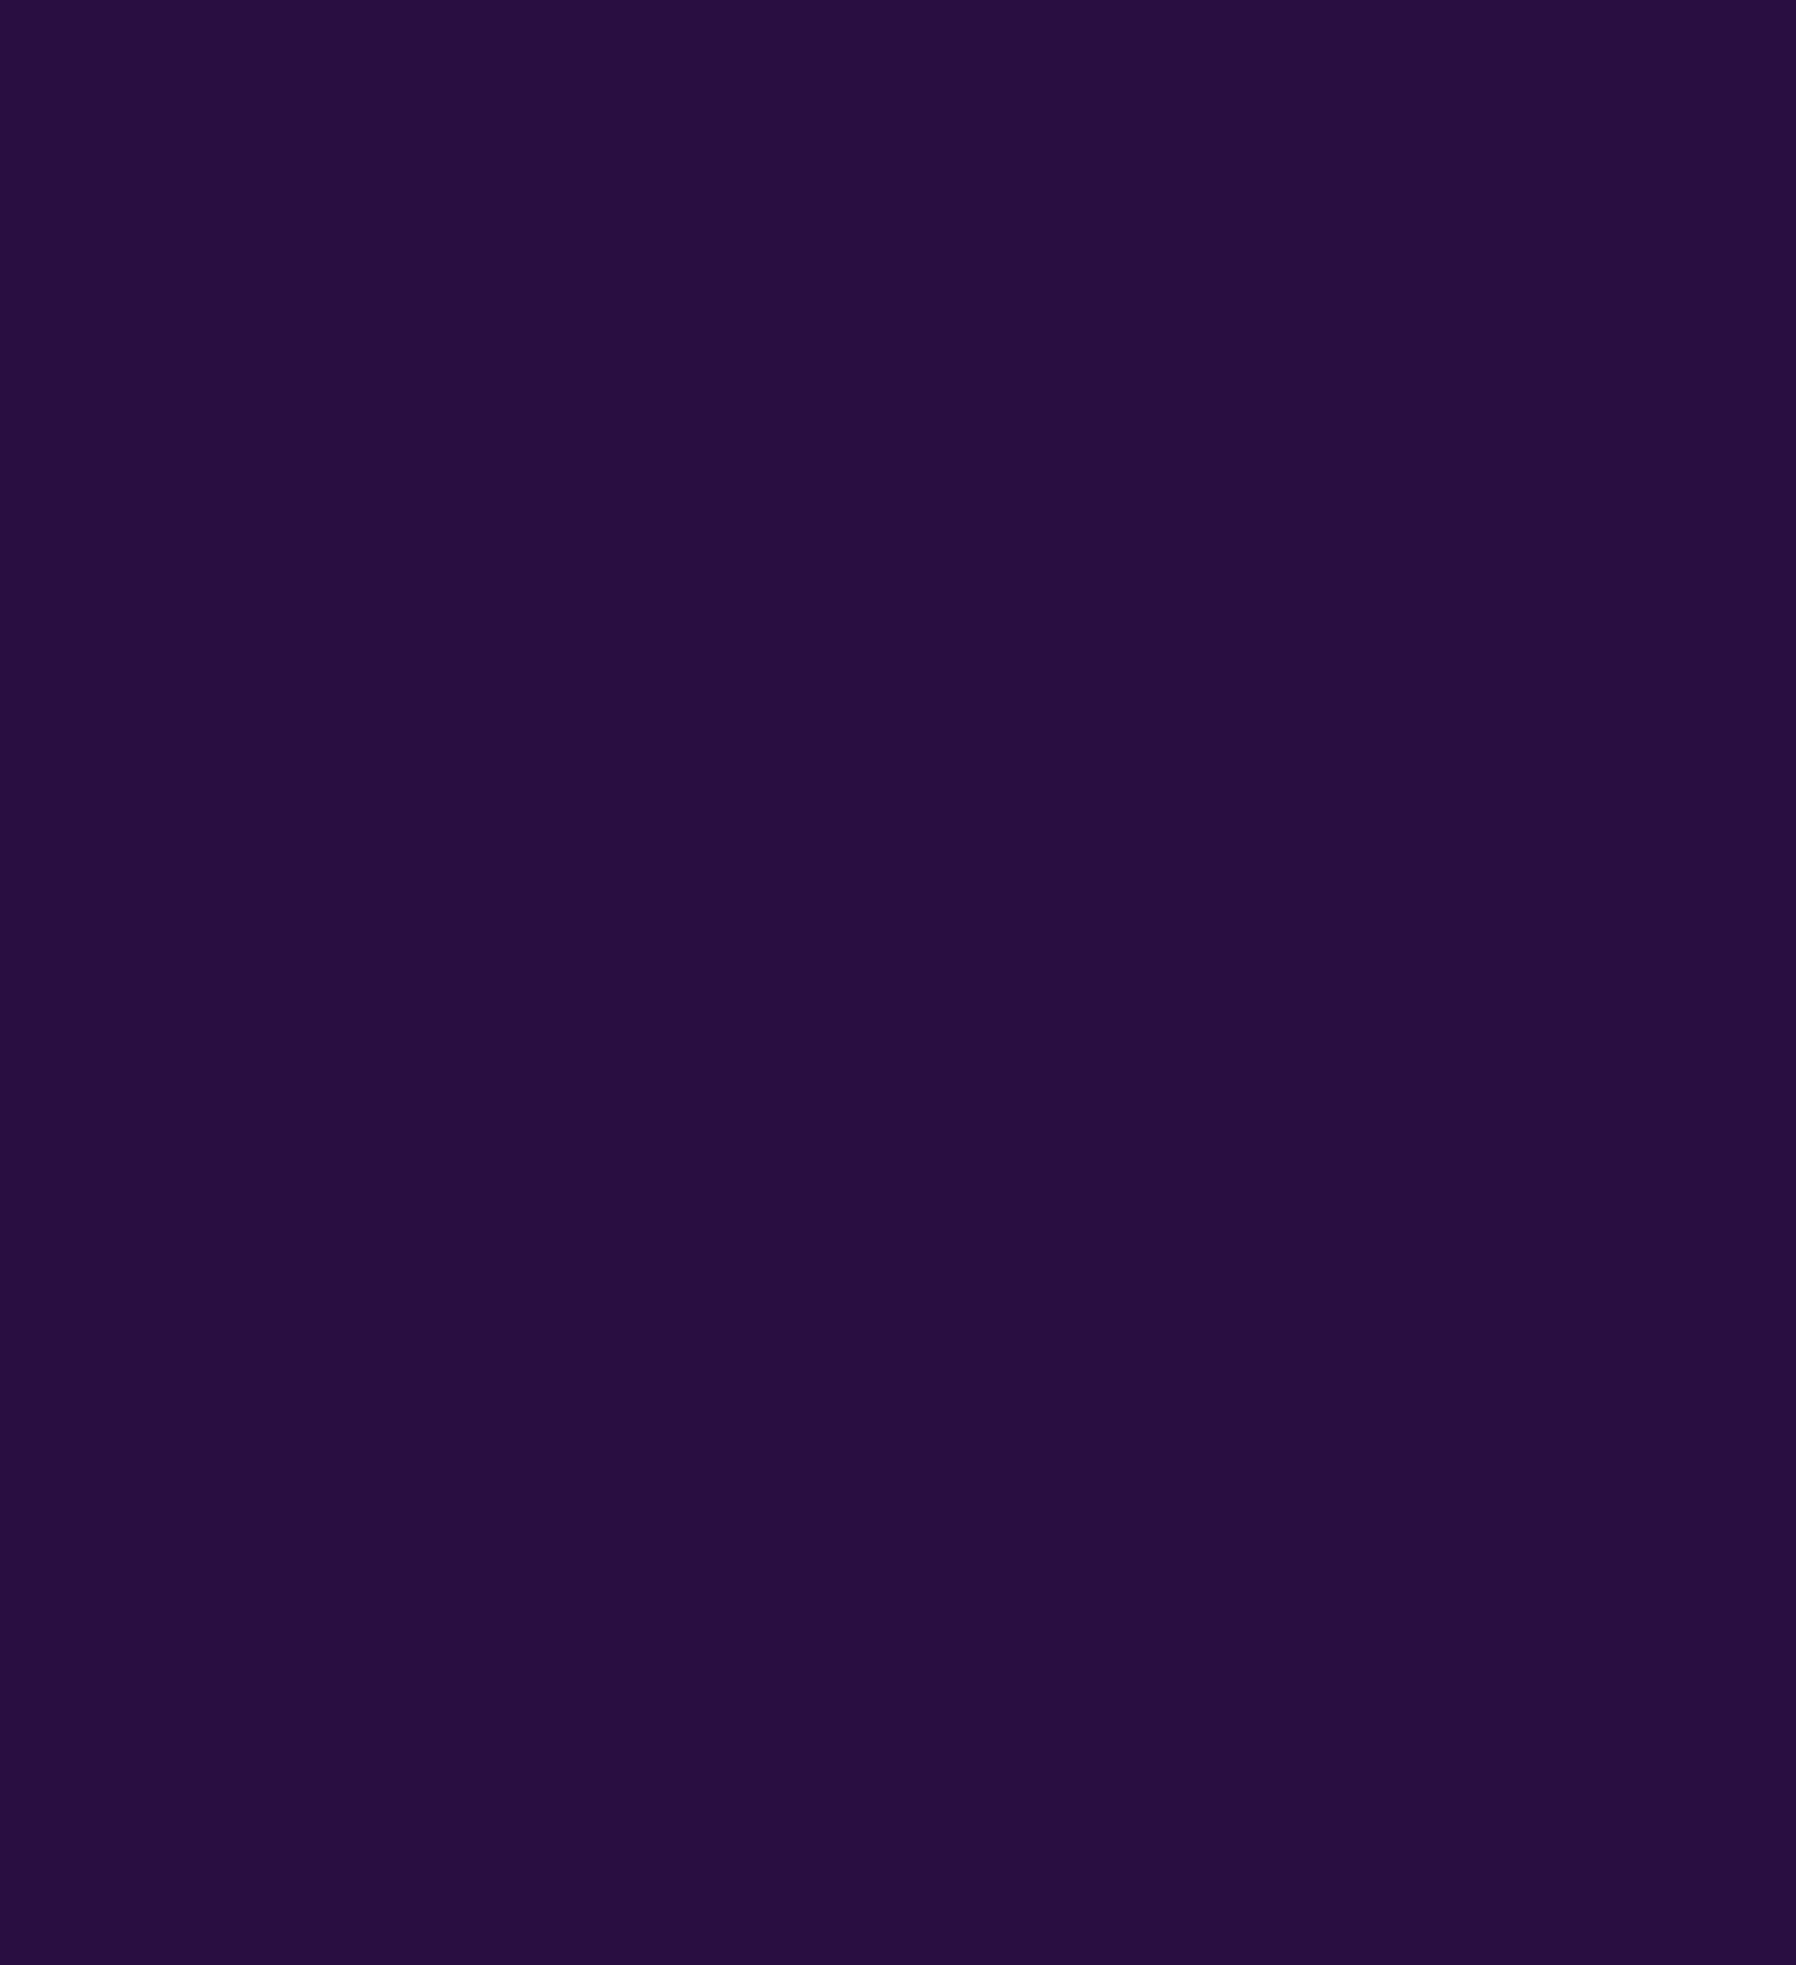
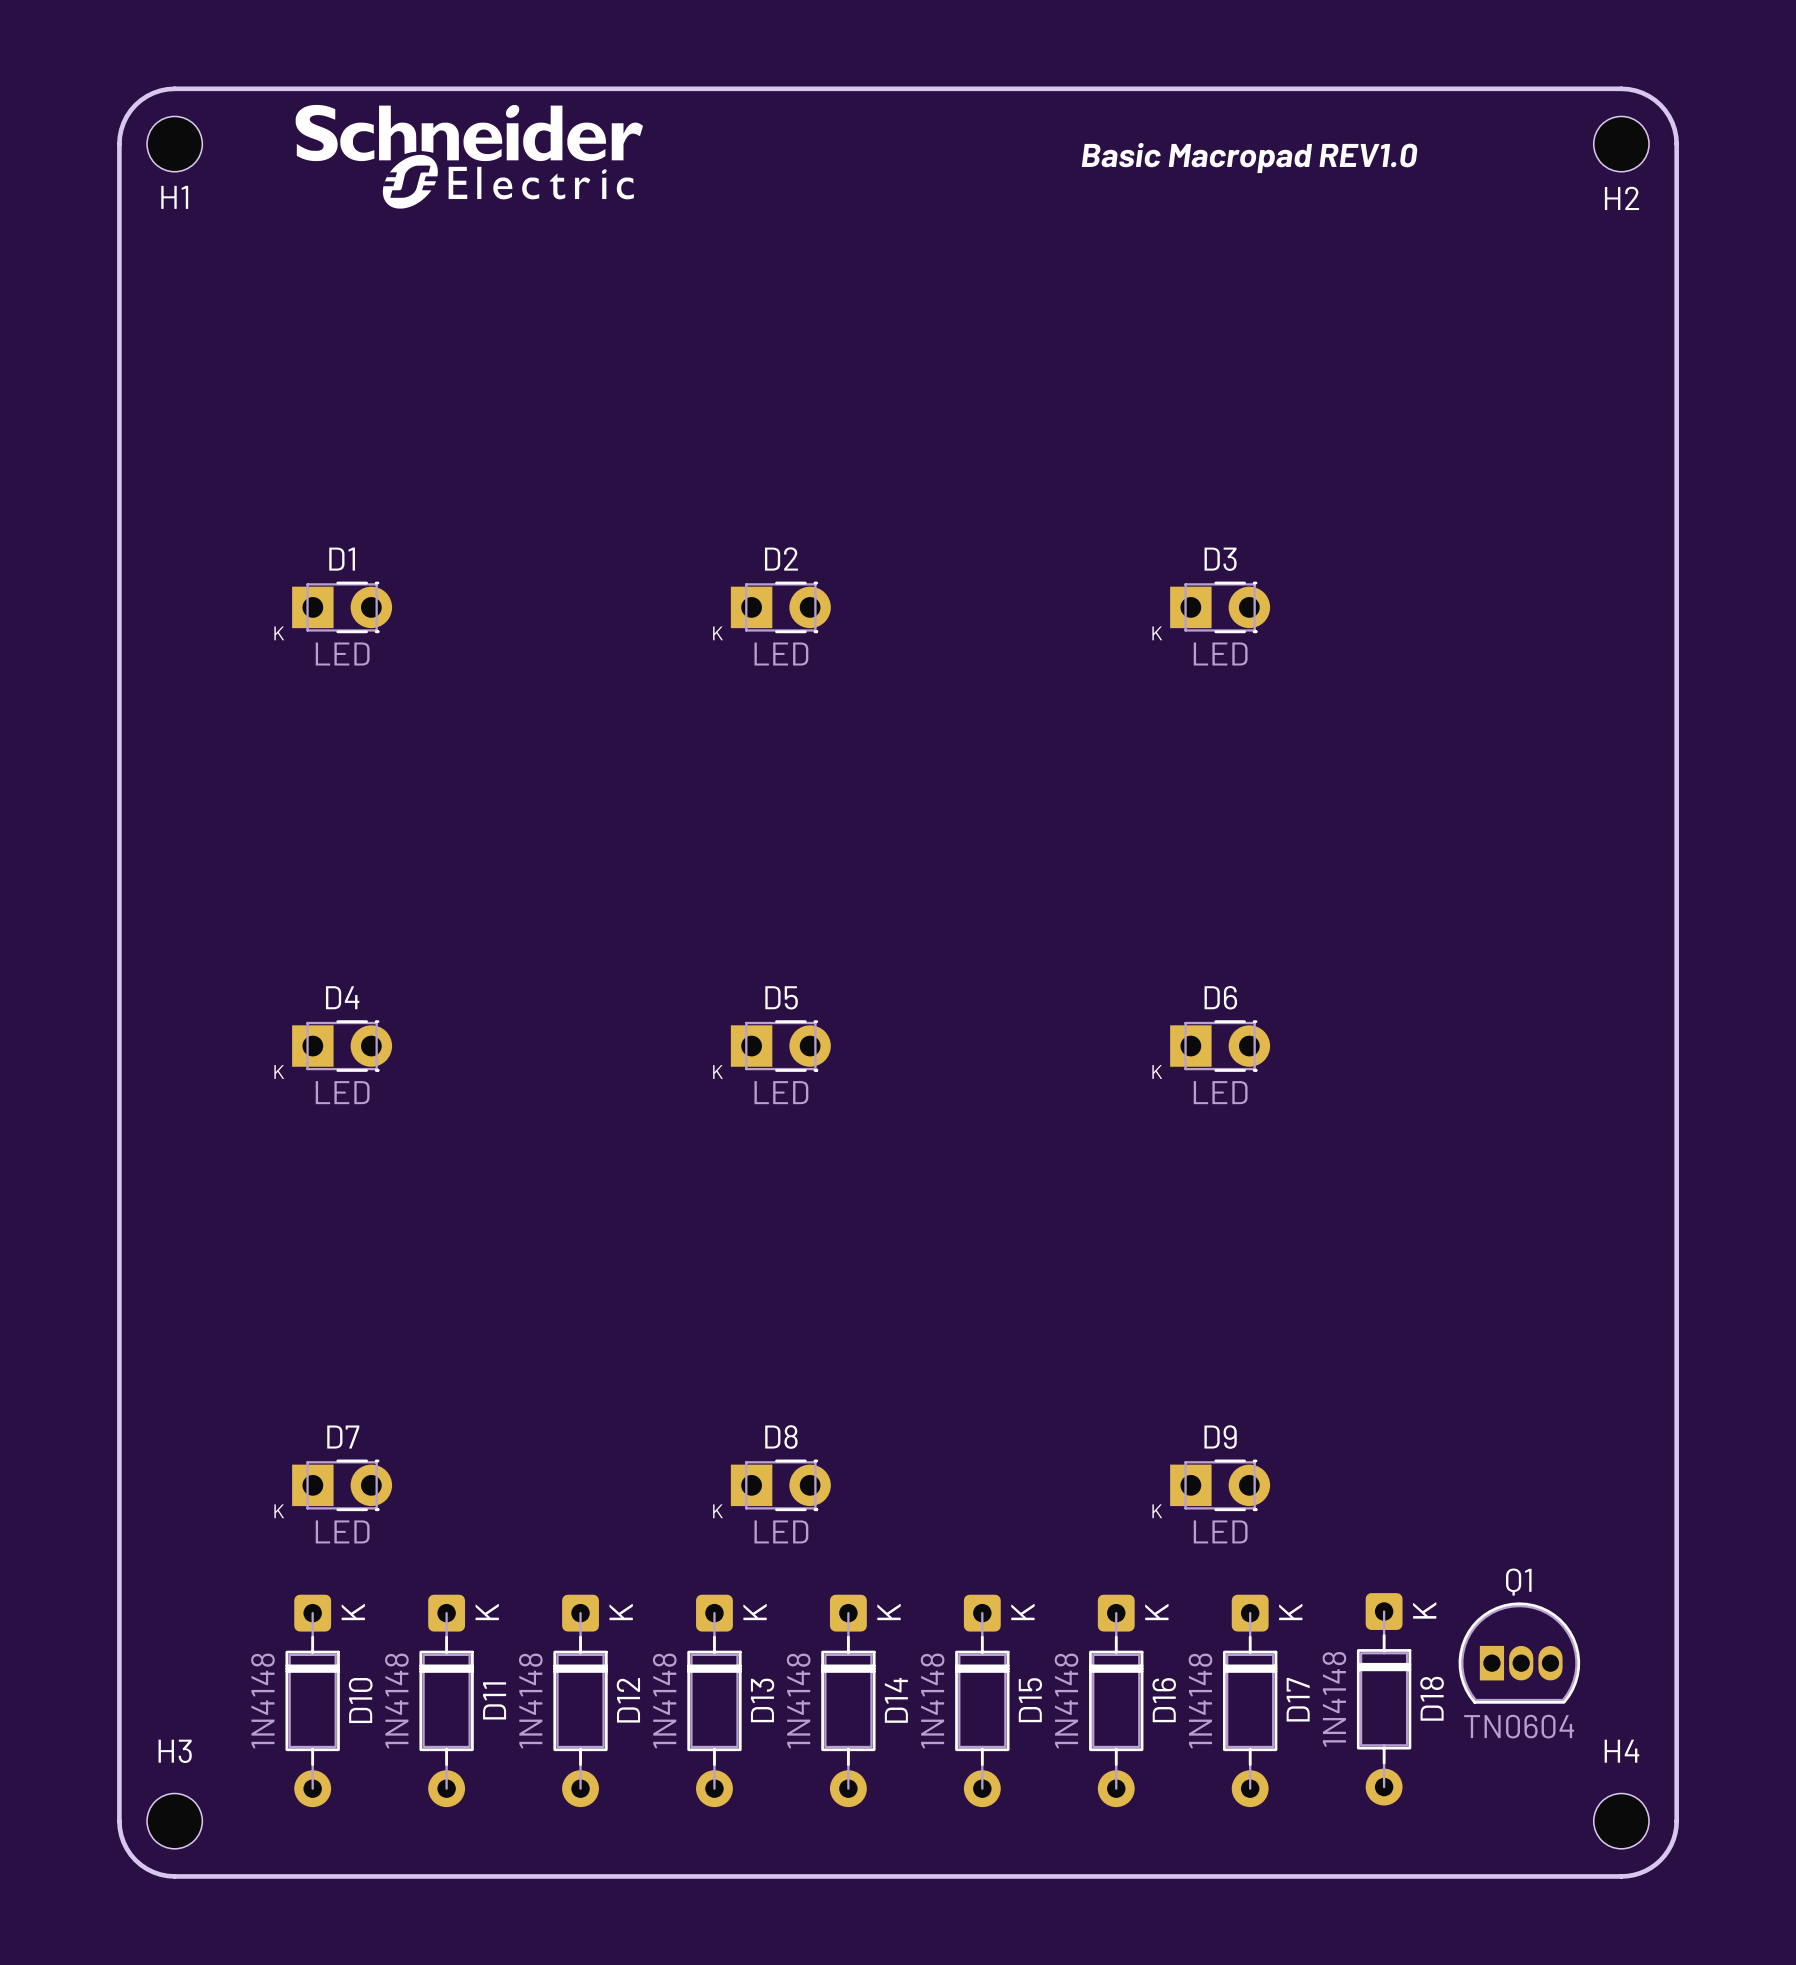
board edge: none -> (174, 88) (1621, 88) (1635, 90) (1648, 96) (1665, 110) (1674, 129) (1676, 143) (1676, 1821) (1671, 1845) (1655, 1864) (1639, 1873) (1621, 1876) (174, 1876) (153, 1872) (141, 1865) (130, 1854) (123, 1842) (119, 1821) (119, 144) (123, 122) (135, 105) (153, 93) (174, 88)
drawing: none -> [295, 104, 643, 209]
H1: none -> (174, 144)
H2: none -> (1621, 144)
text: none -> Basic Macropad REV1.0 (1249, 158)
D1: none -> LED (342, 607)
D2: none -> LED (780, 607)
D3: none -> LED (1220, 607)
D4: none -> LED (342, 1046)
D5: none -> LED (780, 1046)
D6: none -> LED (1220, 1046)
D7: none -> LED (342, 1485)
D8: none -> LED (780, 1485)
D9: none -> LED (1220, 1485)
Q1: none -> TN0604 (1519, 1653)
D18: none -> 1N4148 (1384, 1699)
D10: none -> 1N4148 (312, 1700)
D11: none -> 1N4148 (446, 1700)
D12: none -> 1N4148 (580, 1700)
D13: none -> 1N4148 (714, 1700)
D14: none -> 1N4148 (848, 1700)
D15: none -> 1N4148 (982, 1700)
D16: none -> 1N4148 (1116, 1700)
D17: none -> 1N4148 (1250, 1700)
H3: none -> (174, 1821)
H4: none -> (1621, 1821)

